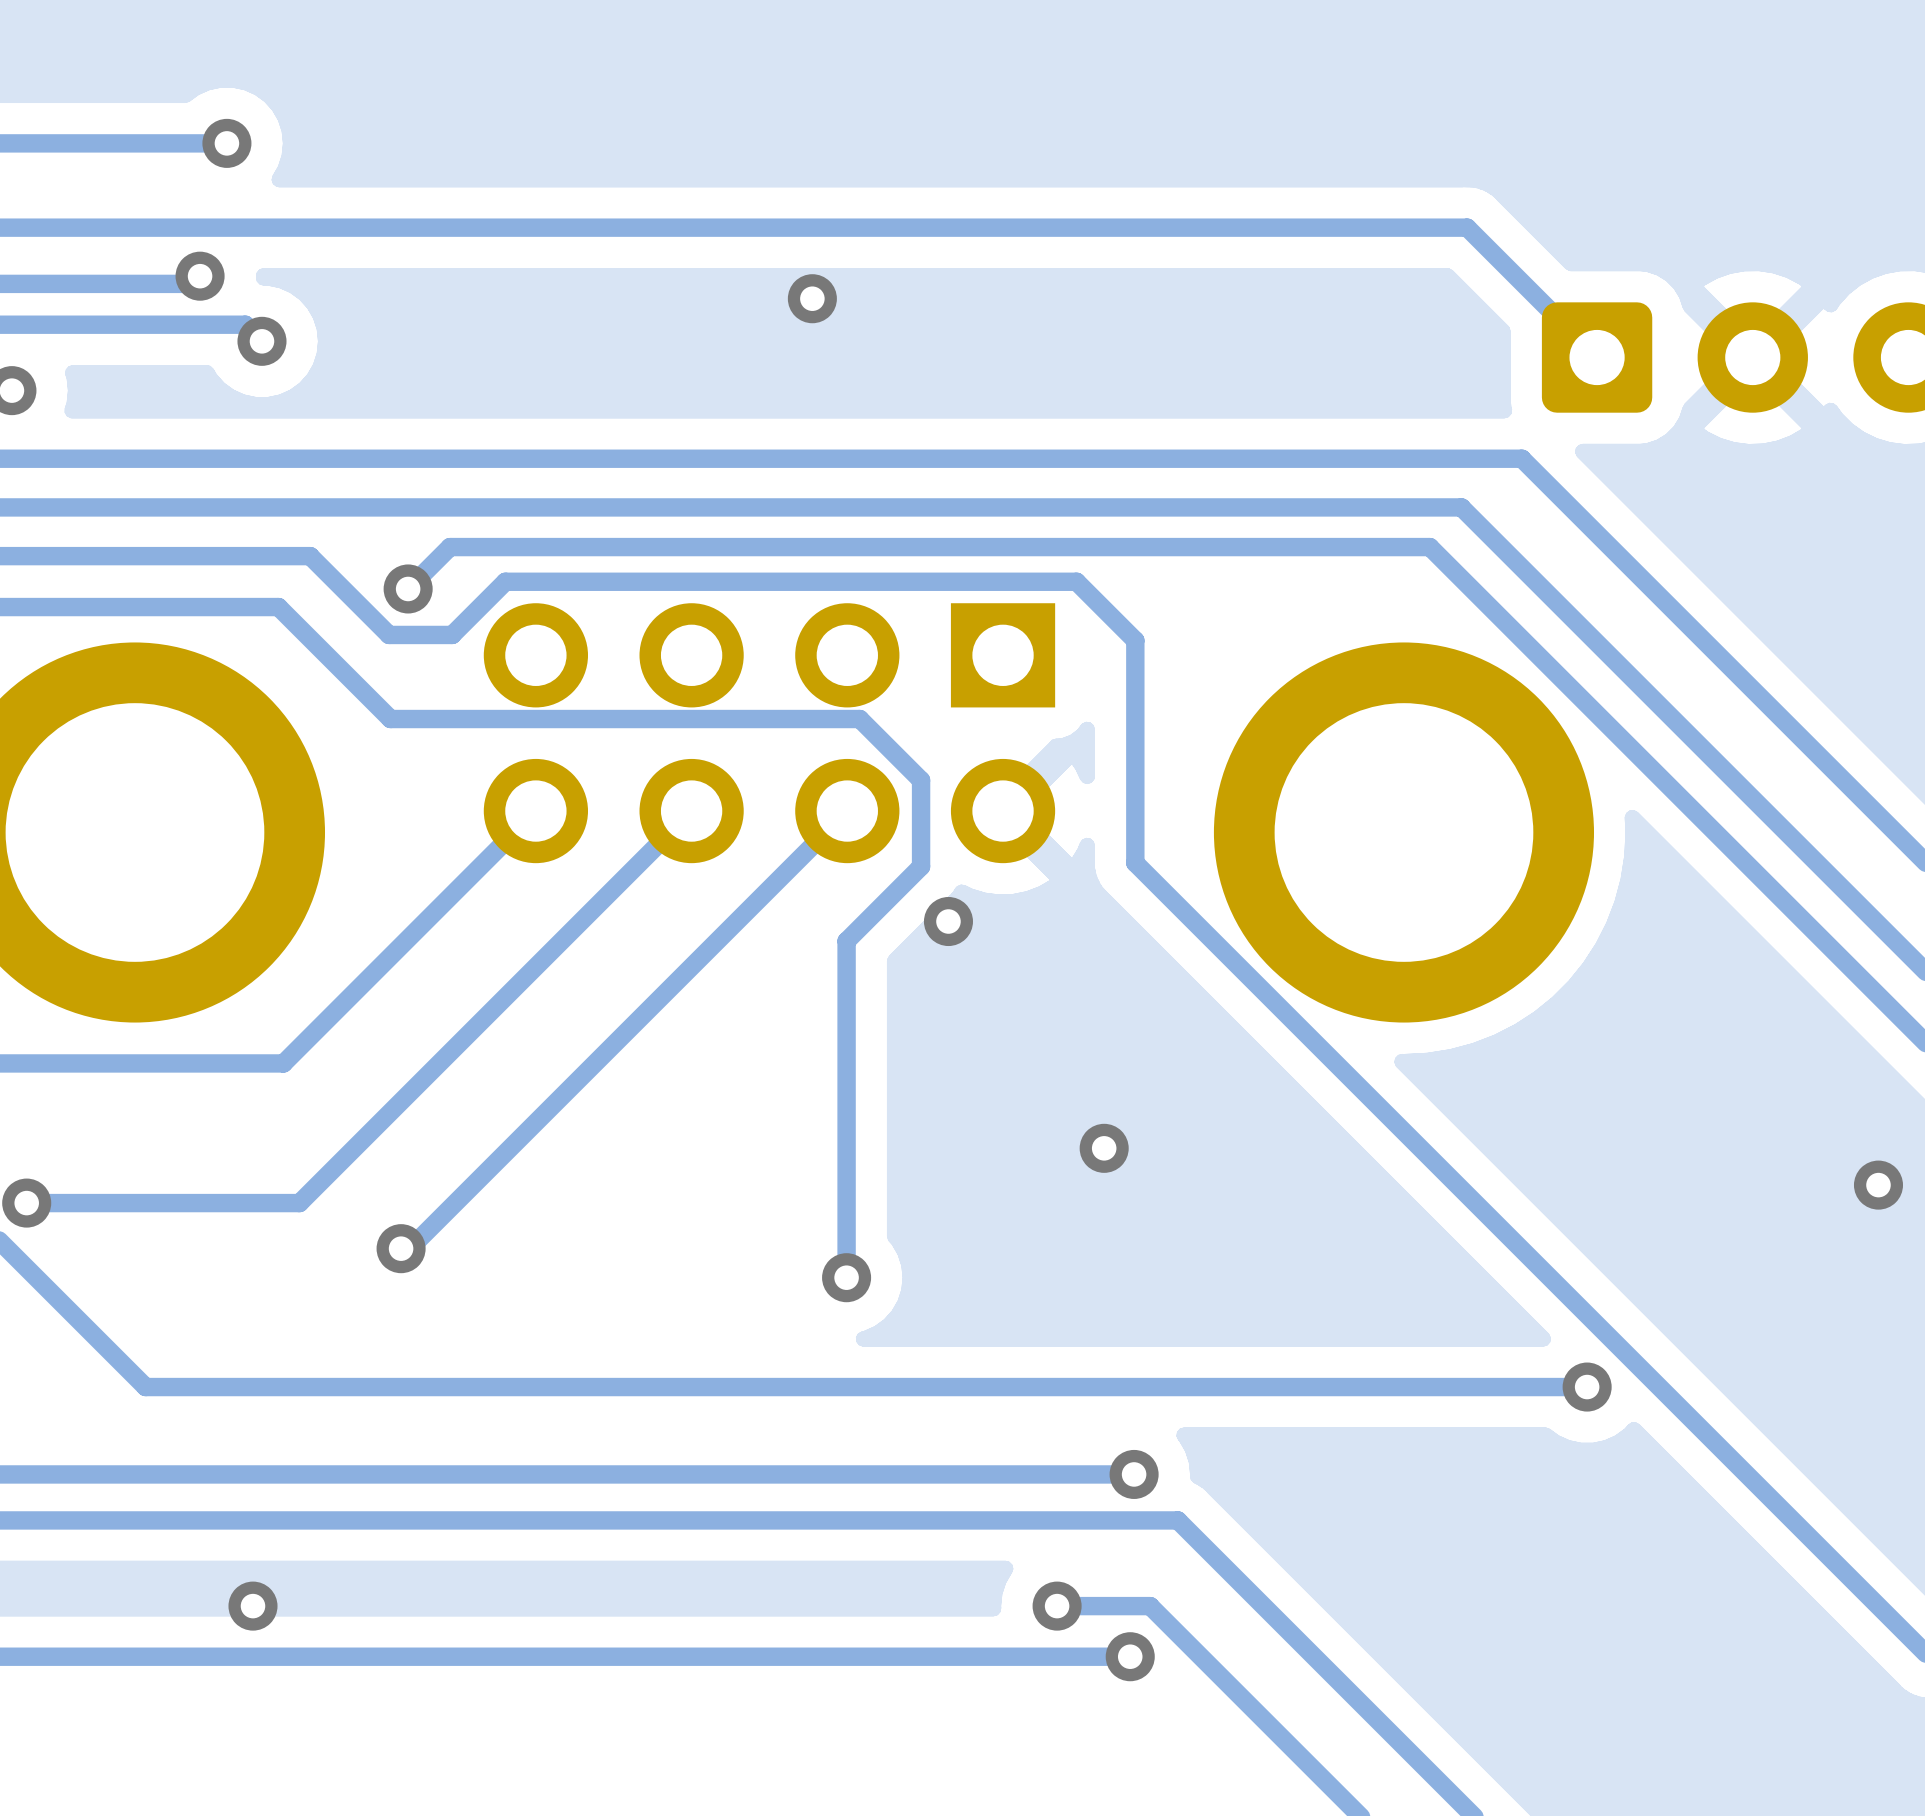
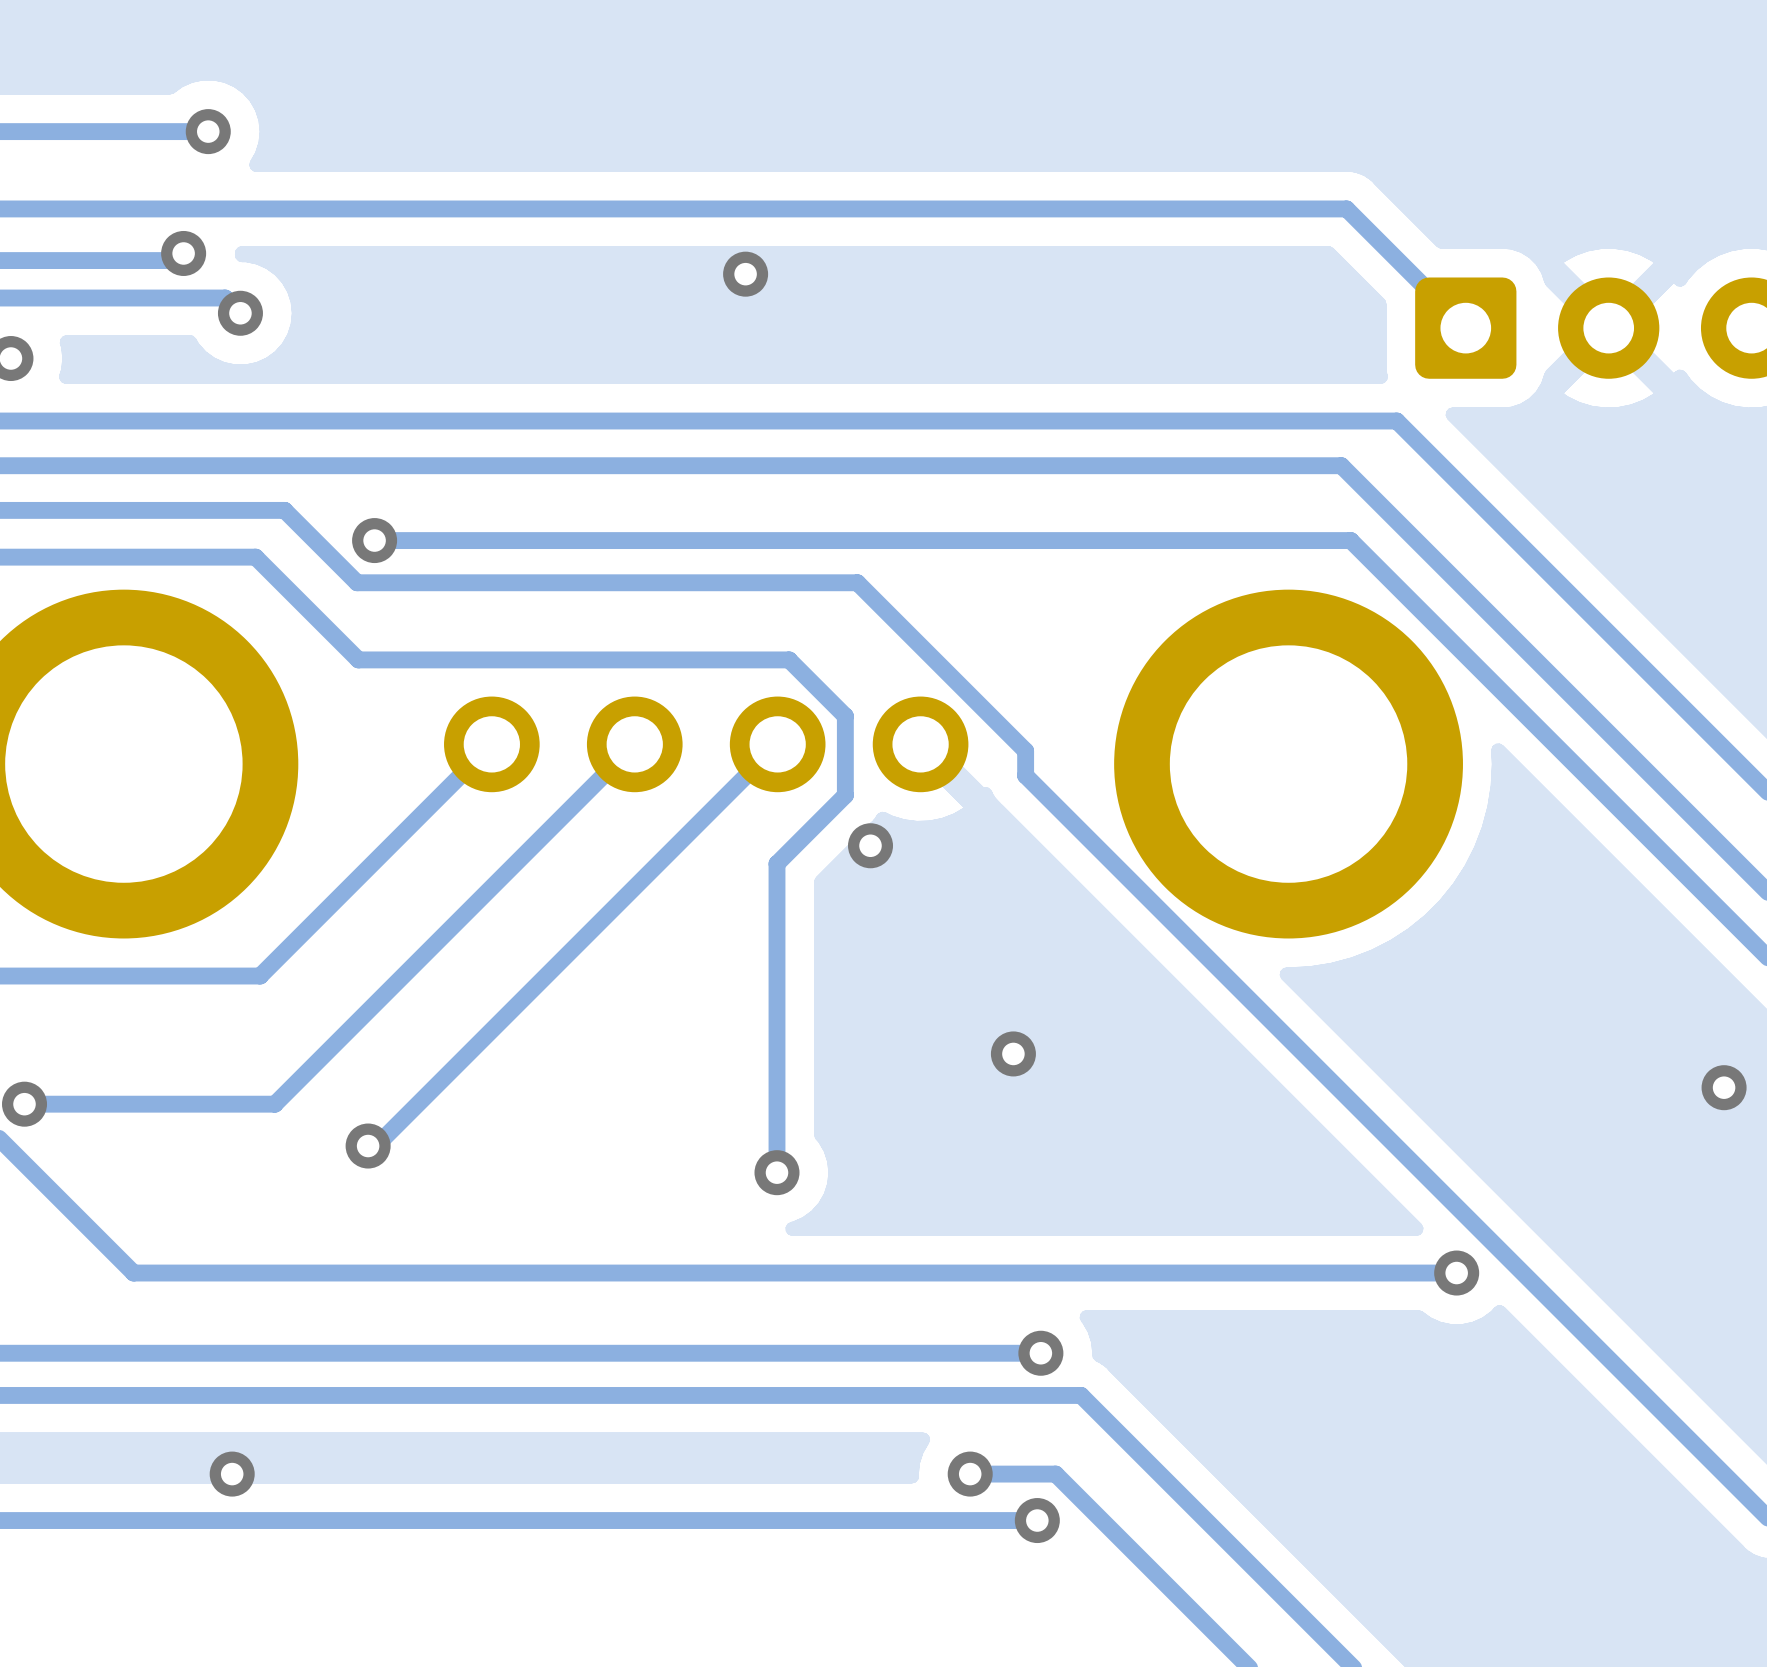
track: (1471, 588) (1429, 547) (450, 547) (408, 588) -> (1350, 540) (374, 540)
track: (452, 634) (505, 581) (1076, 581) (1135, 640) (1135, 862) -> (415, 582) (857, 582) (1025, 750) (1025, 775) (1042, 792)
part: (769, 655) -> none

